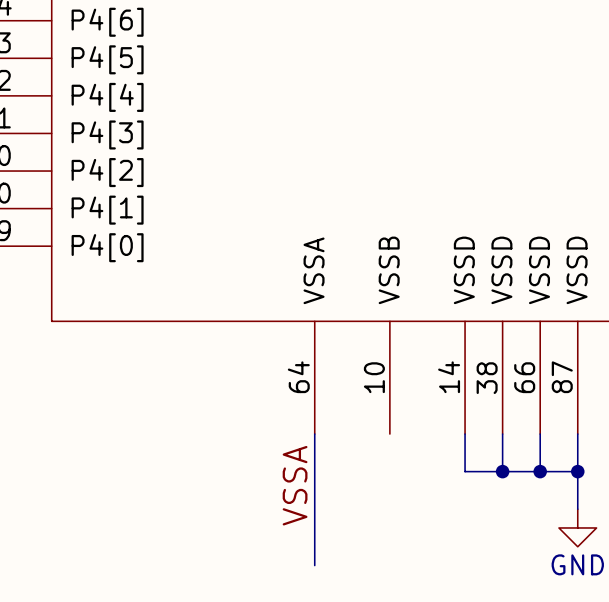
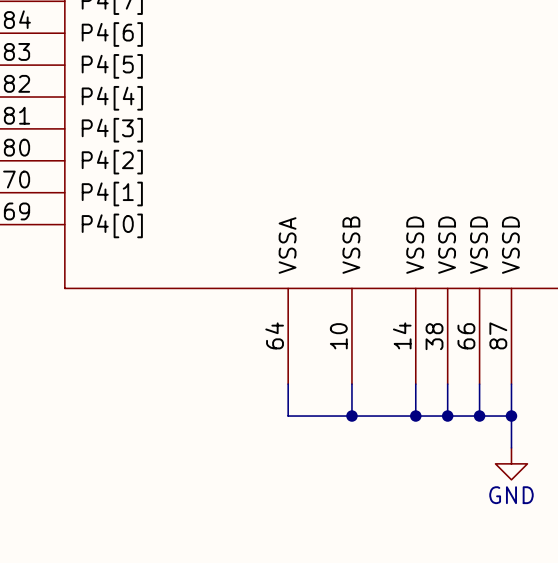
wire: none -> (351, 384) (351, 416)
wire: (314, 471) (314, 565) -> (288, 416) (415, 416)
junction: none -> (351, 416)
junction: none -> (415, 416)
label: VSSA (295, 485) -> none

